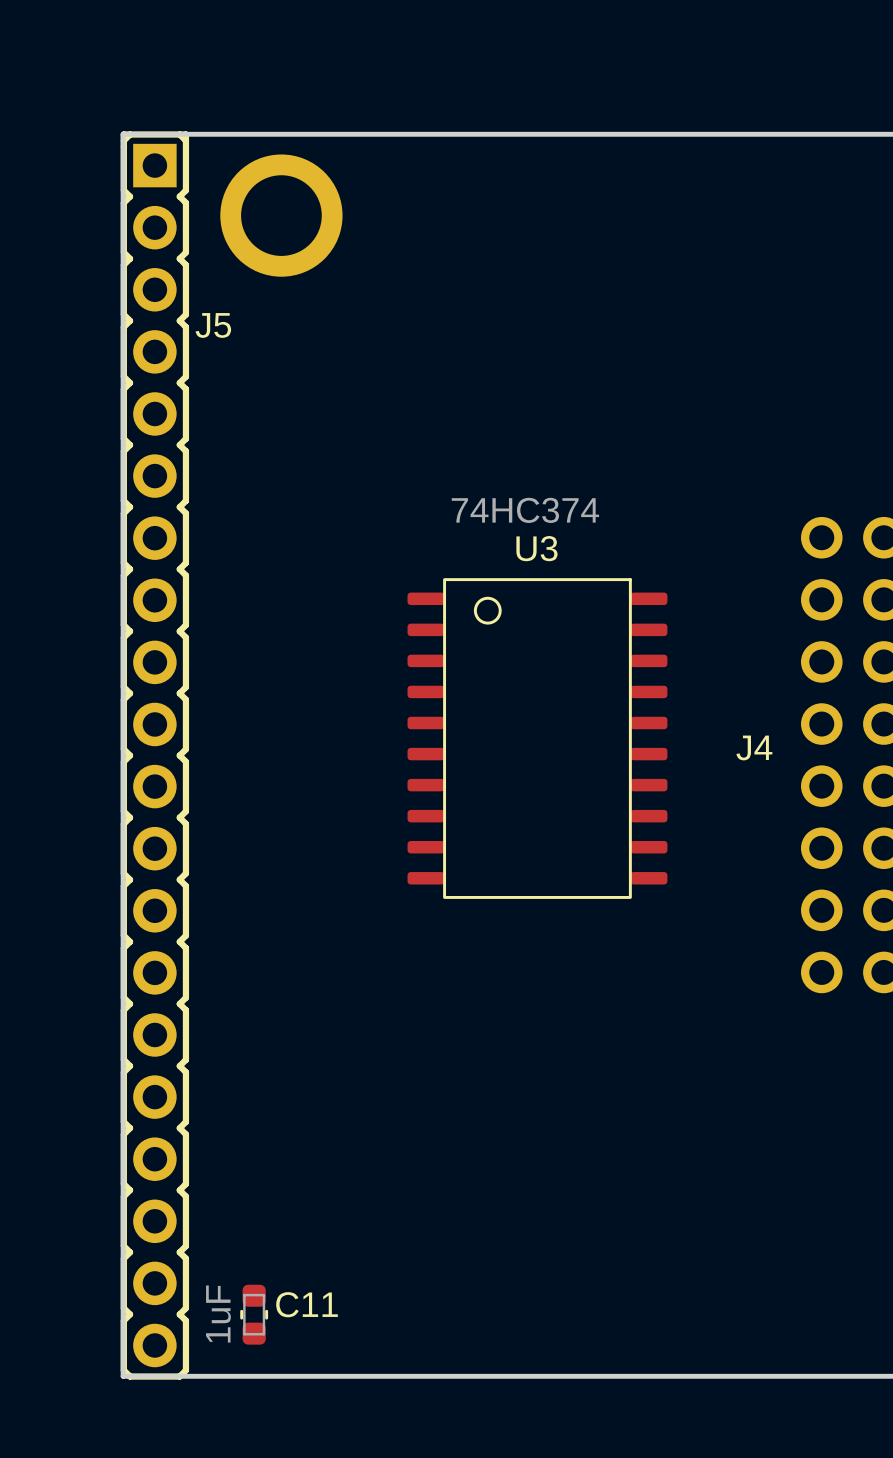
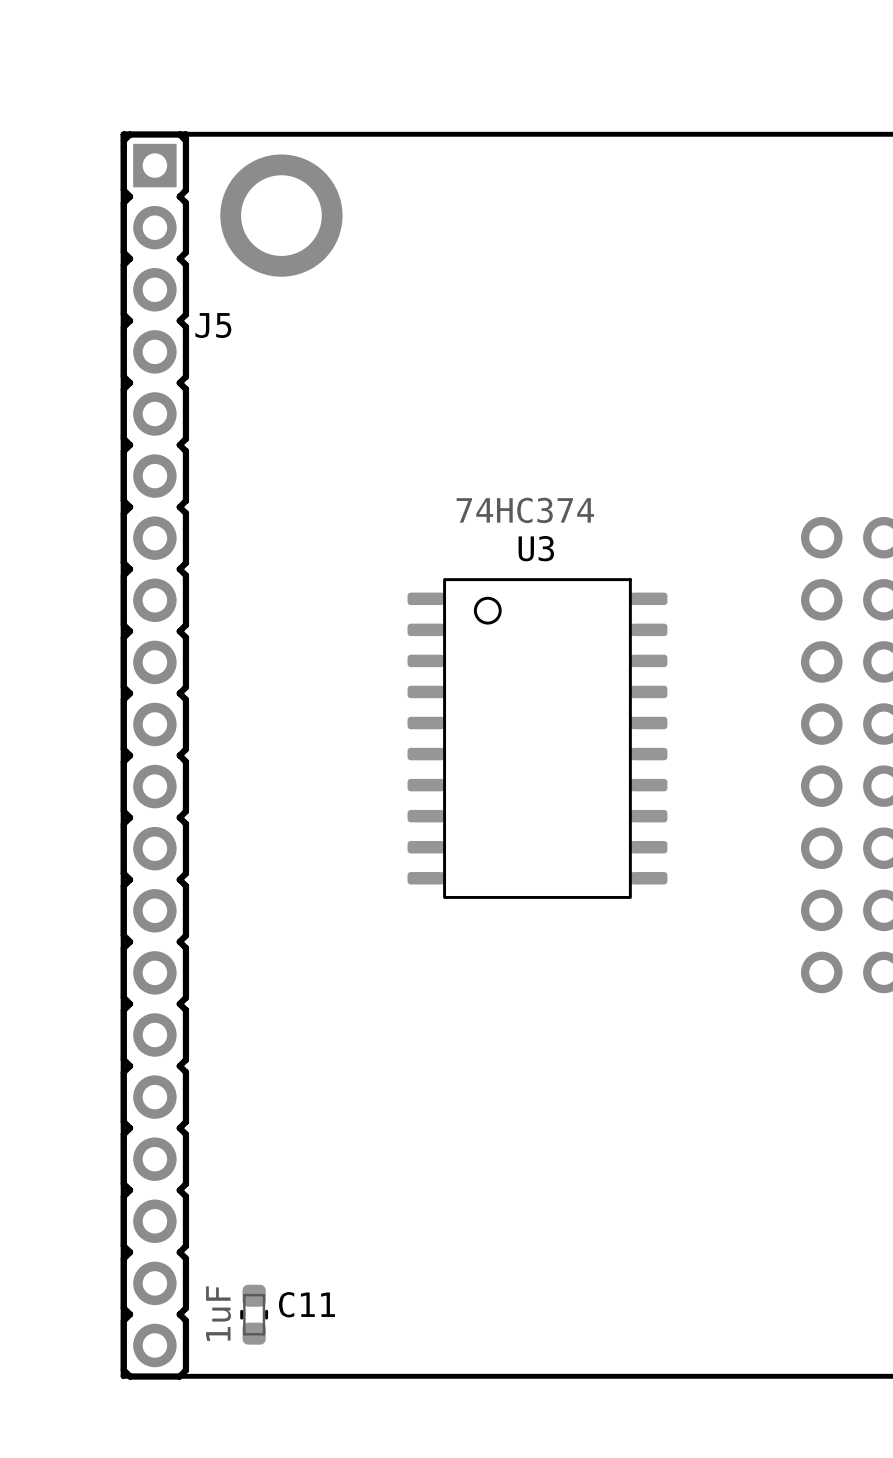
J4 name: J4 (754, 747) -> none

